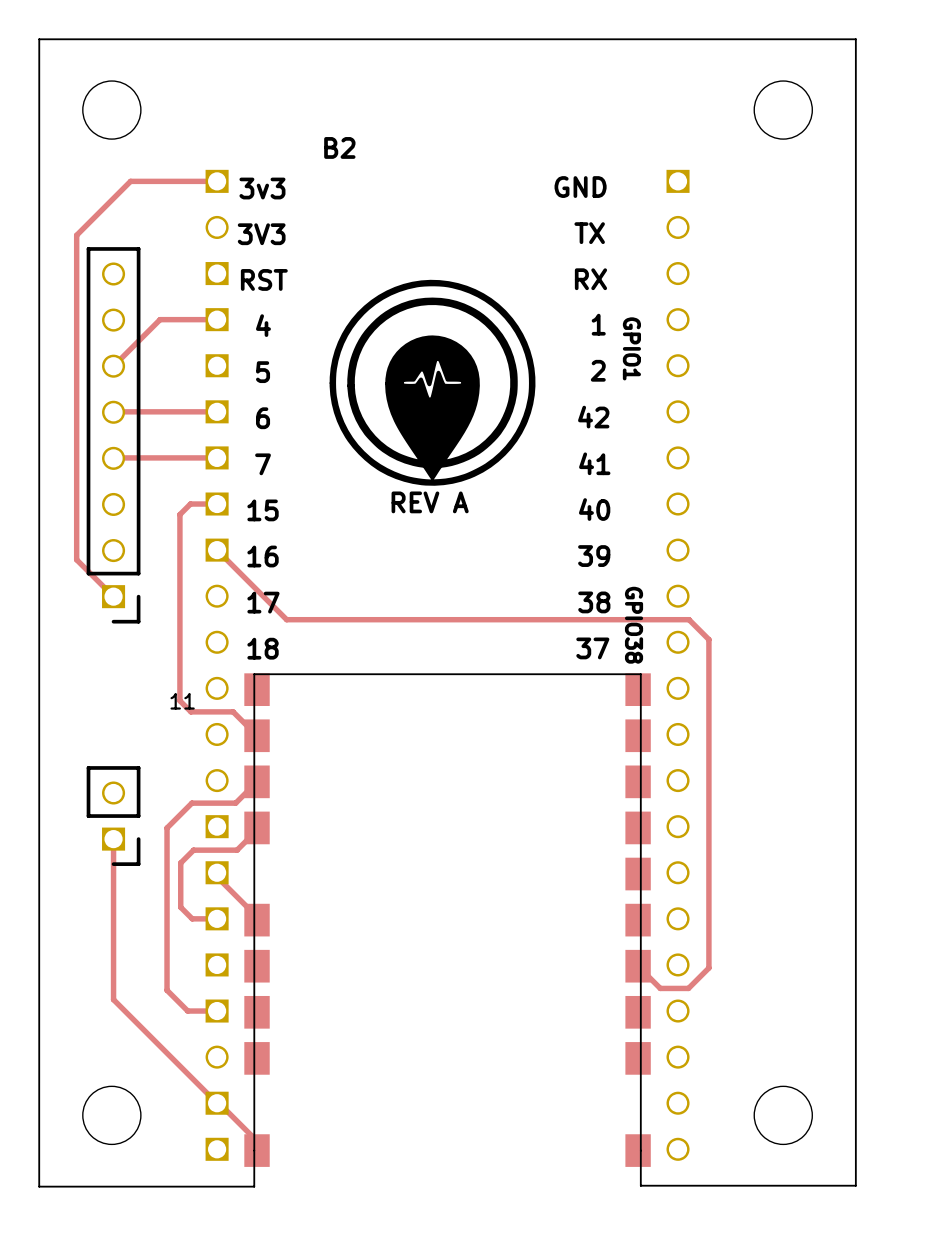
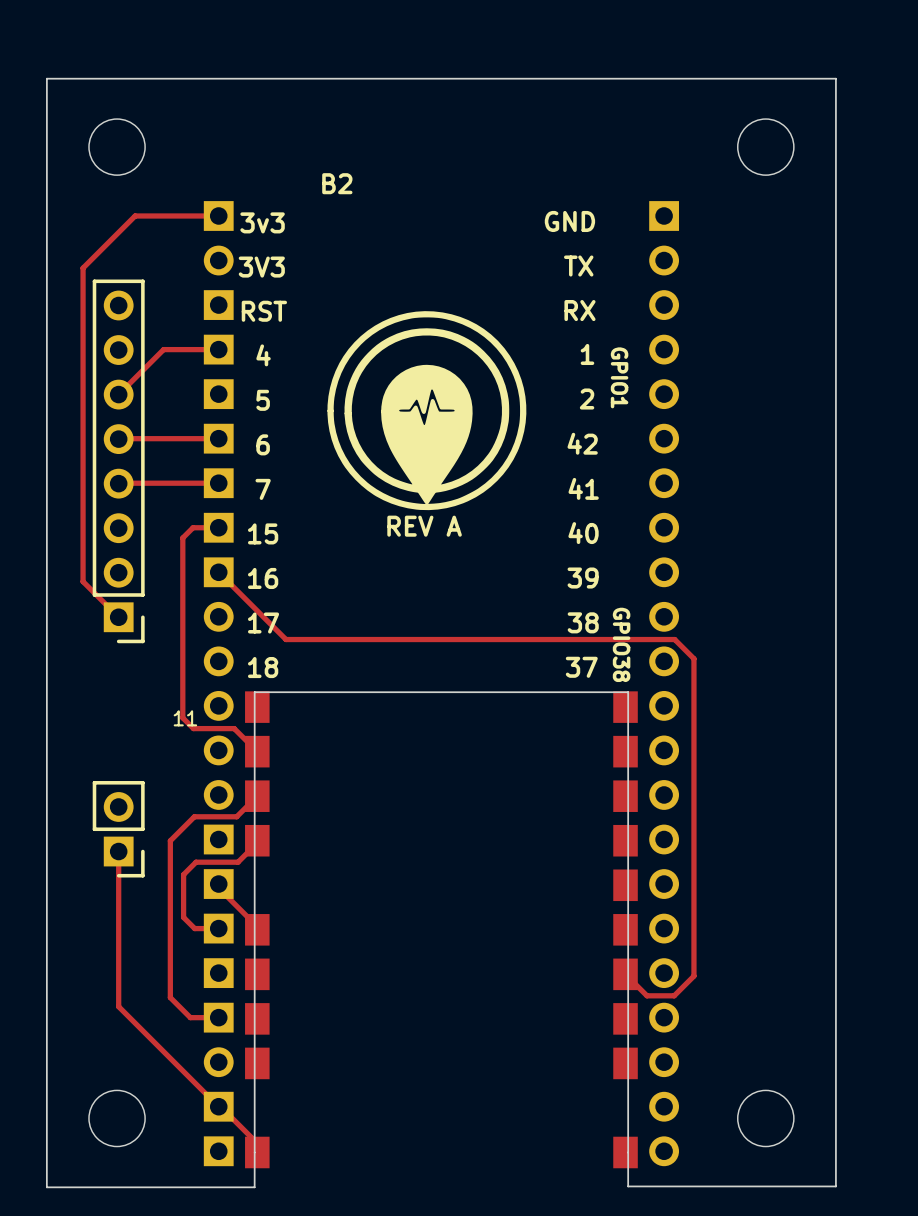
B2 footprint: [205, 169, 690, 1161] -> [203, 201, 680, 1167]
part footprint: [86, 247, 141, 624] -> [92, 279, 145, 644]
part footprint: [86, 766, 141, 866] -> [92, 781, 145, 878]

